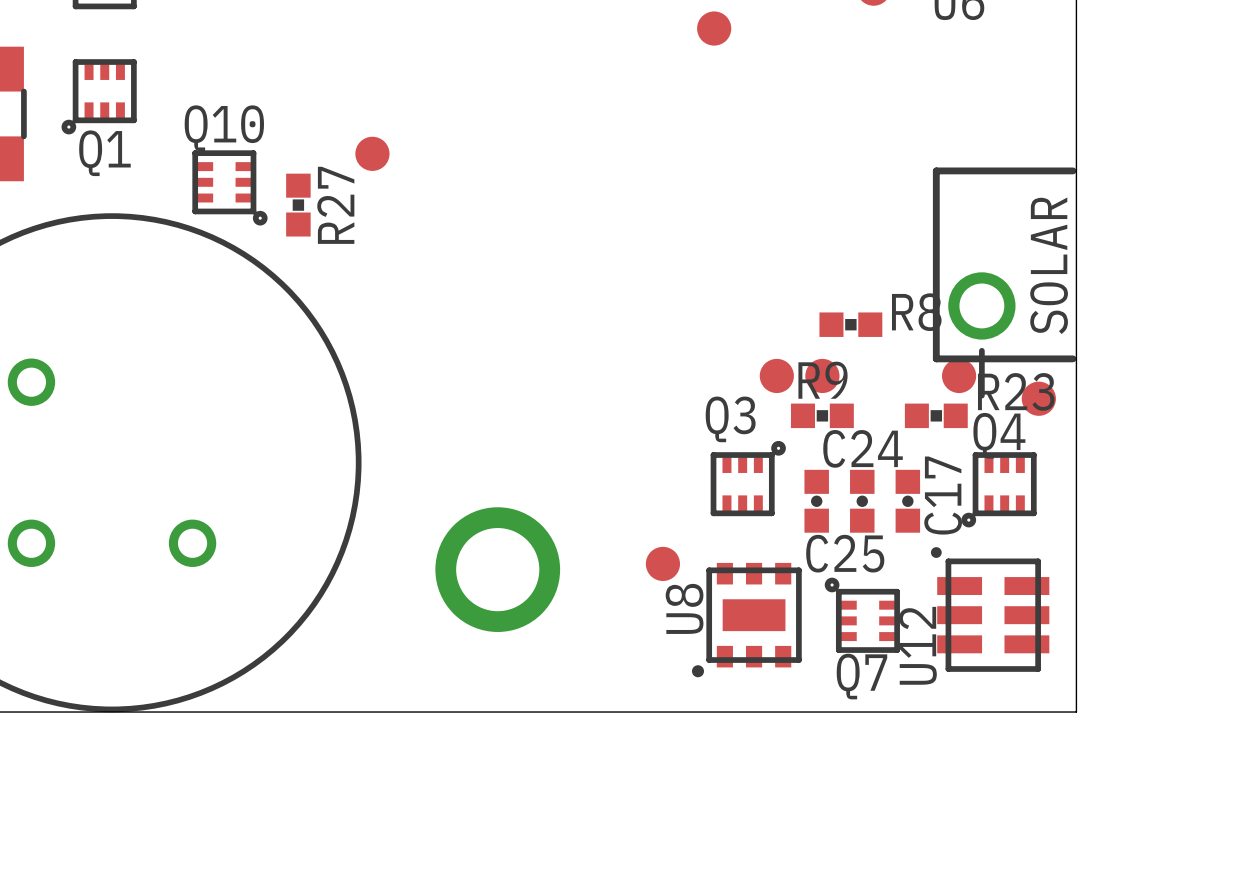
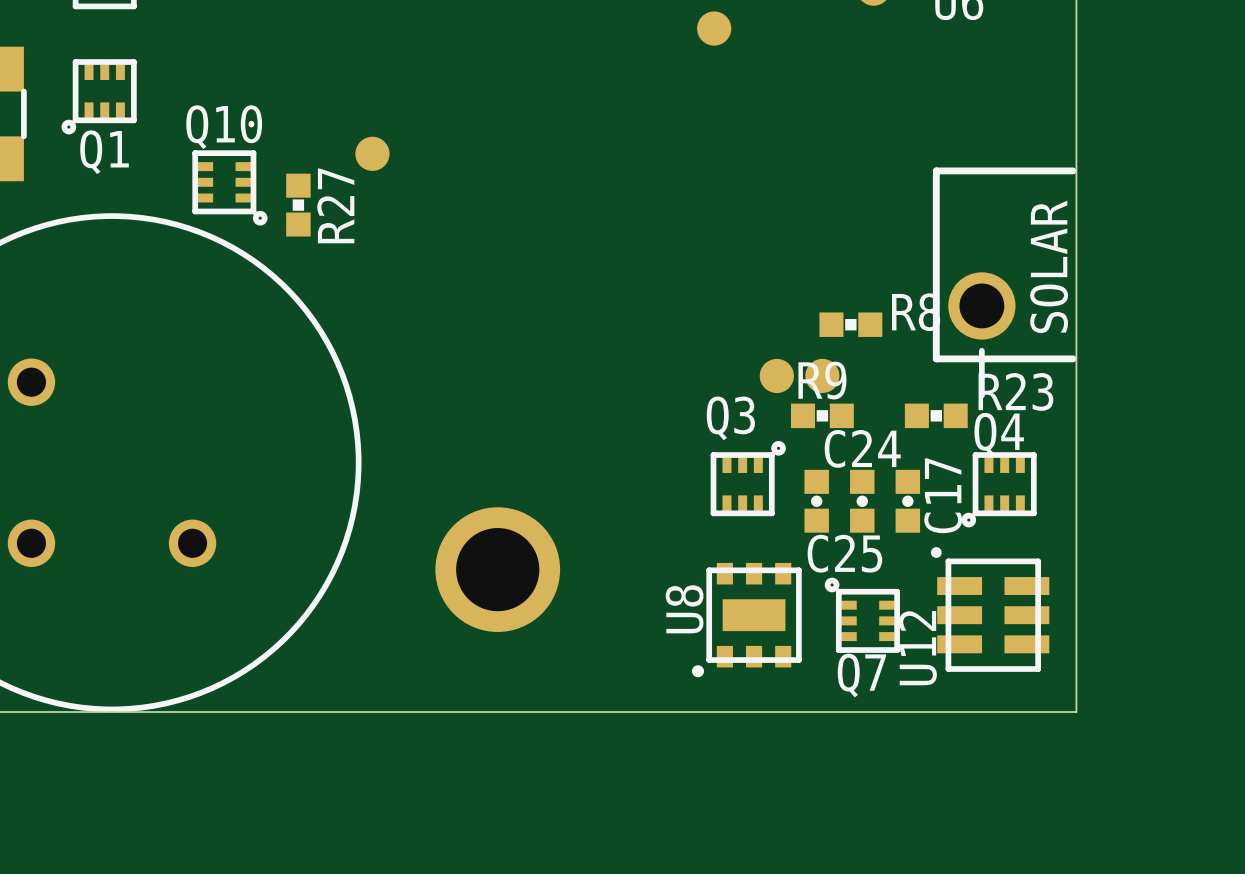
part: (959, 375) -> none
part: (1038, 398) -> none
part: (662, 563) -> none

